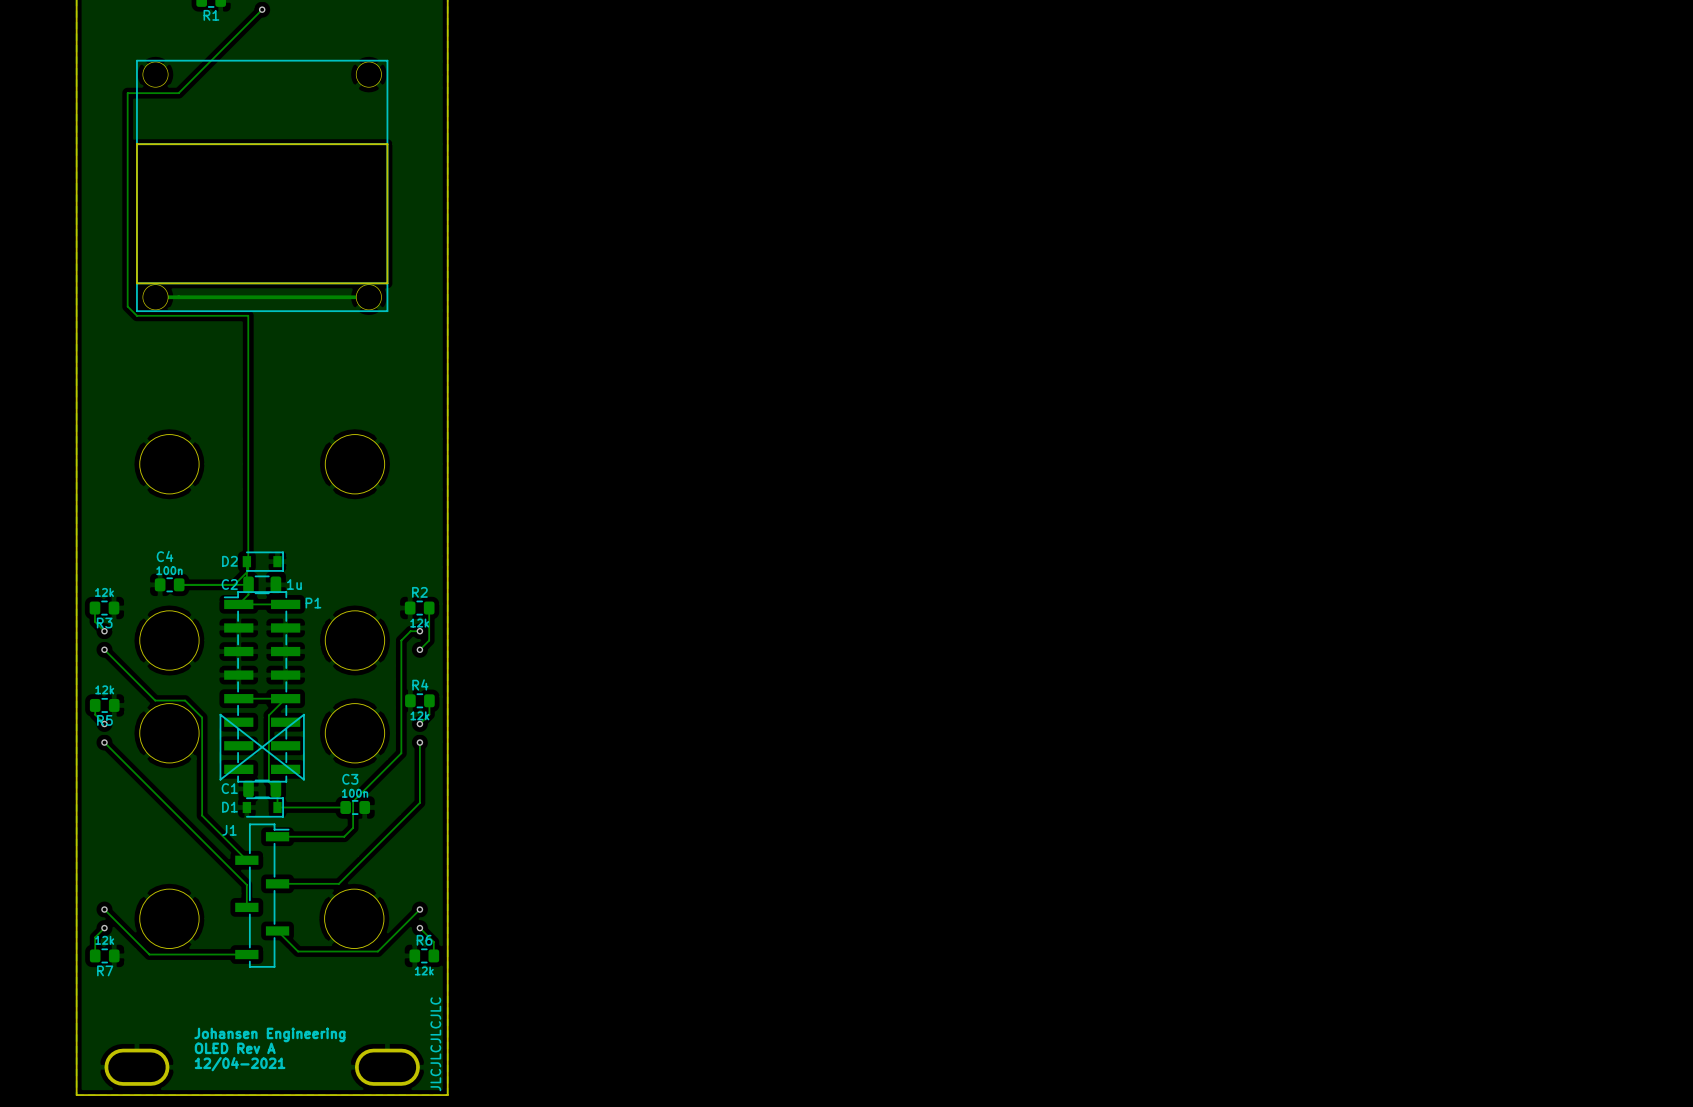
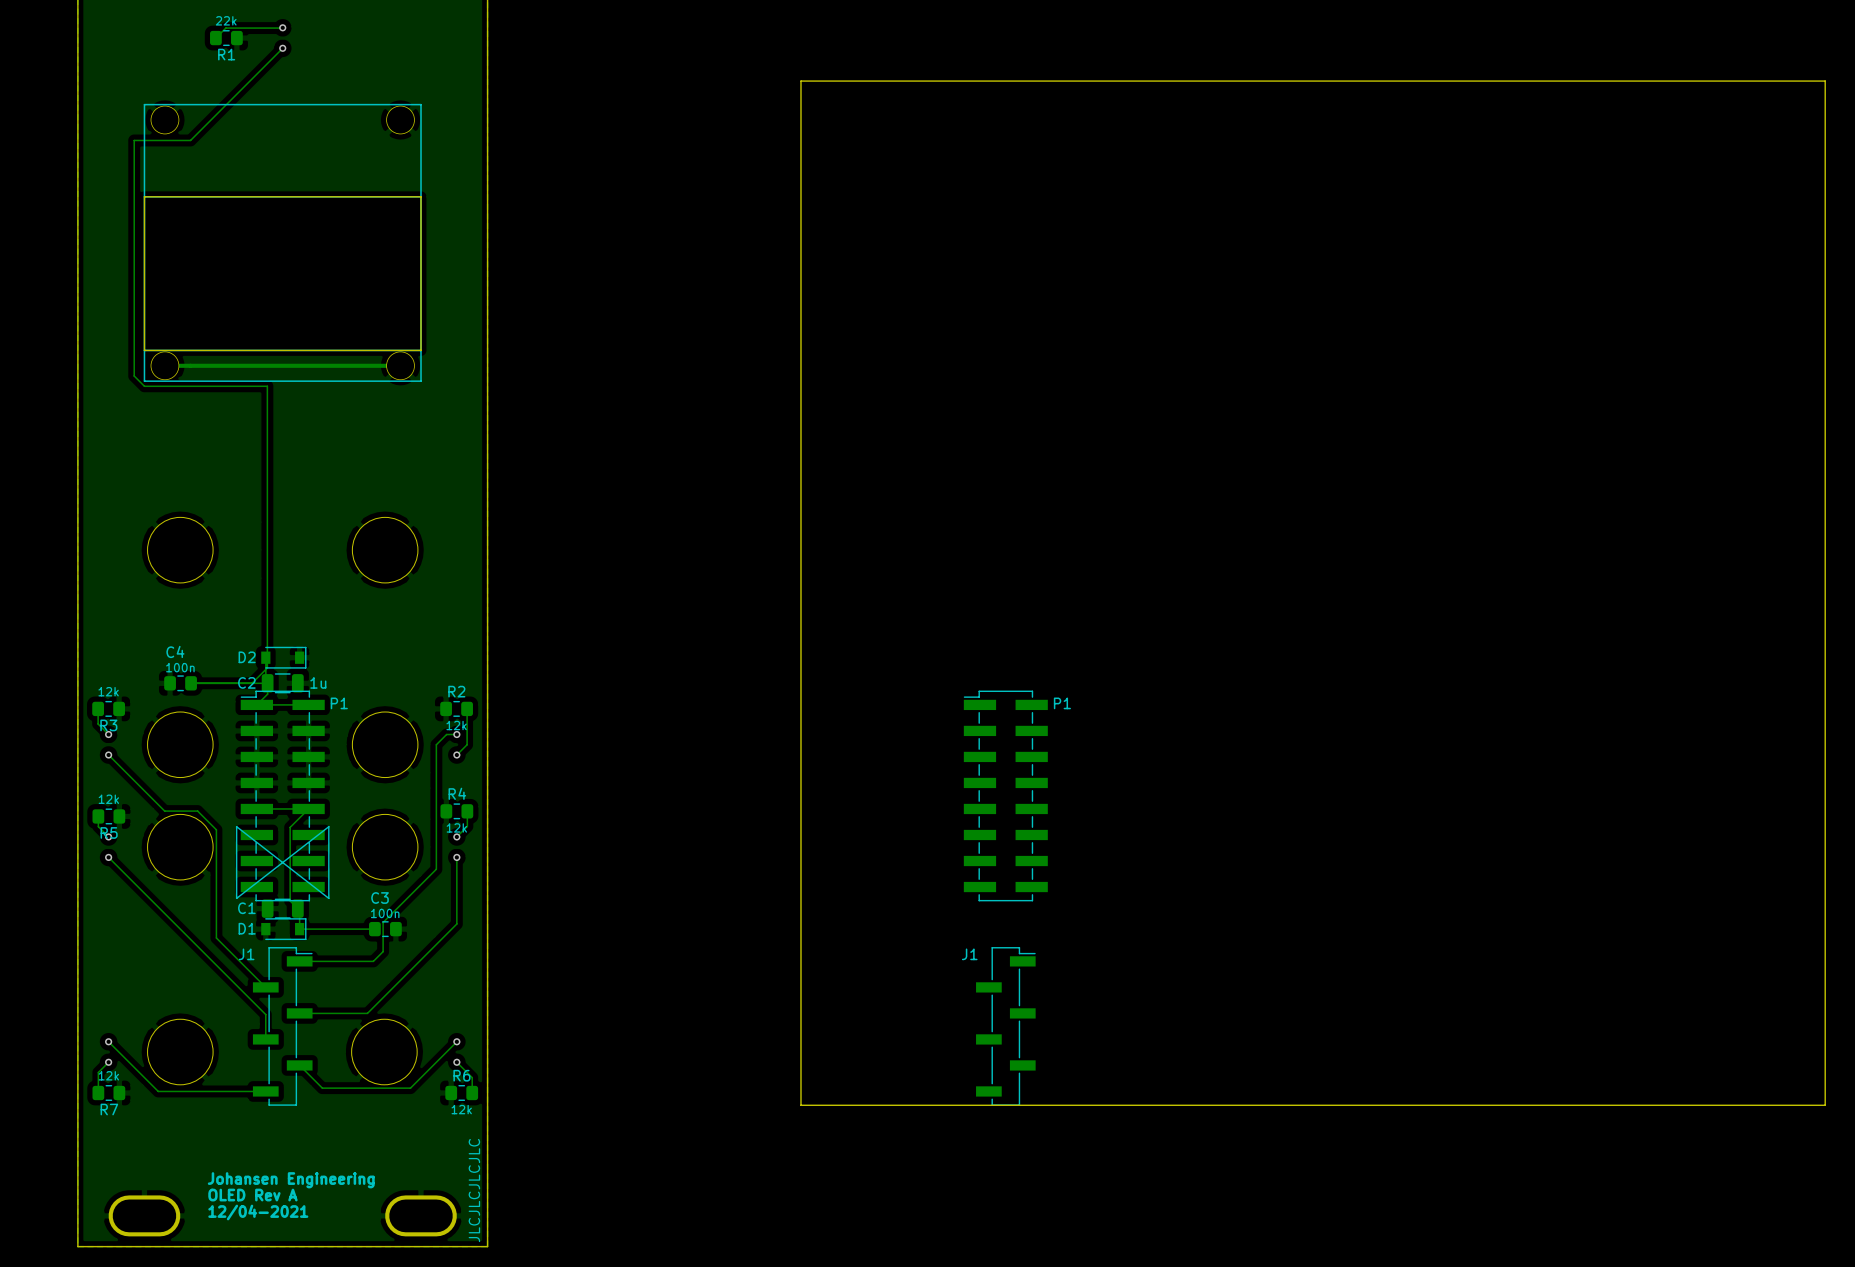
board edge: none -> (1825, 81) (800, 81) (800, 1105) (1825, 1105) (1825, 81)
P1: none -> (1005, 795)
J1: none -> (1005, 1026)

